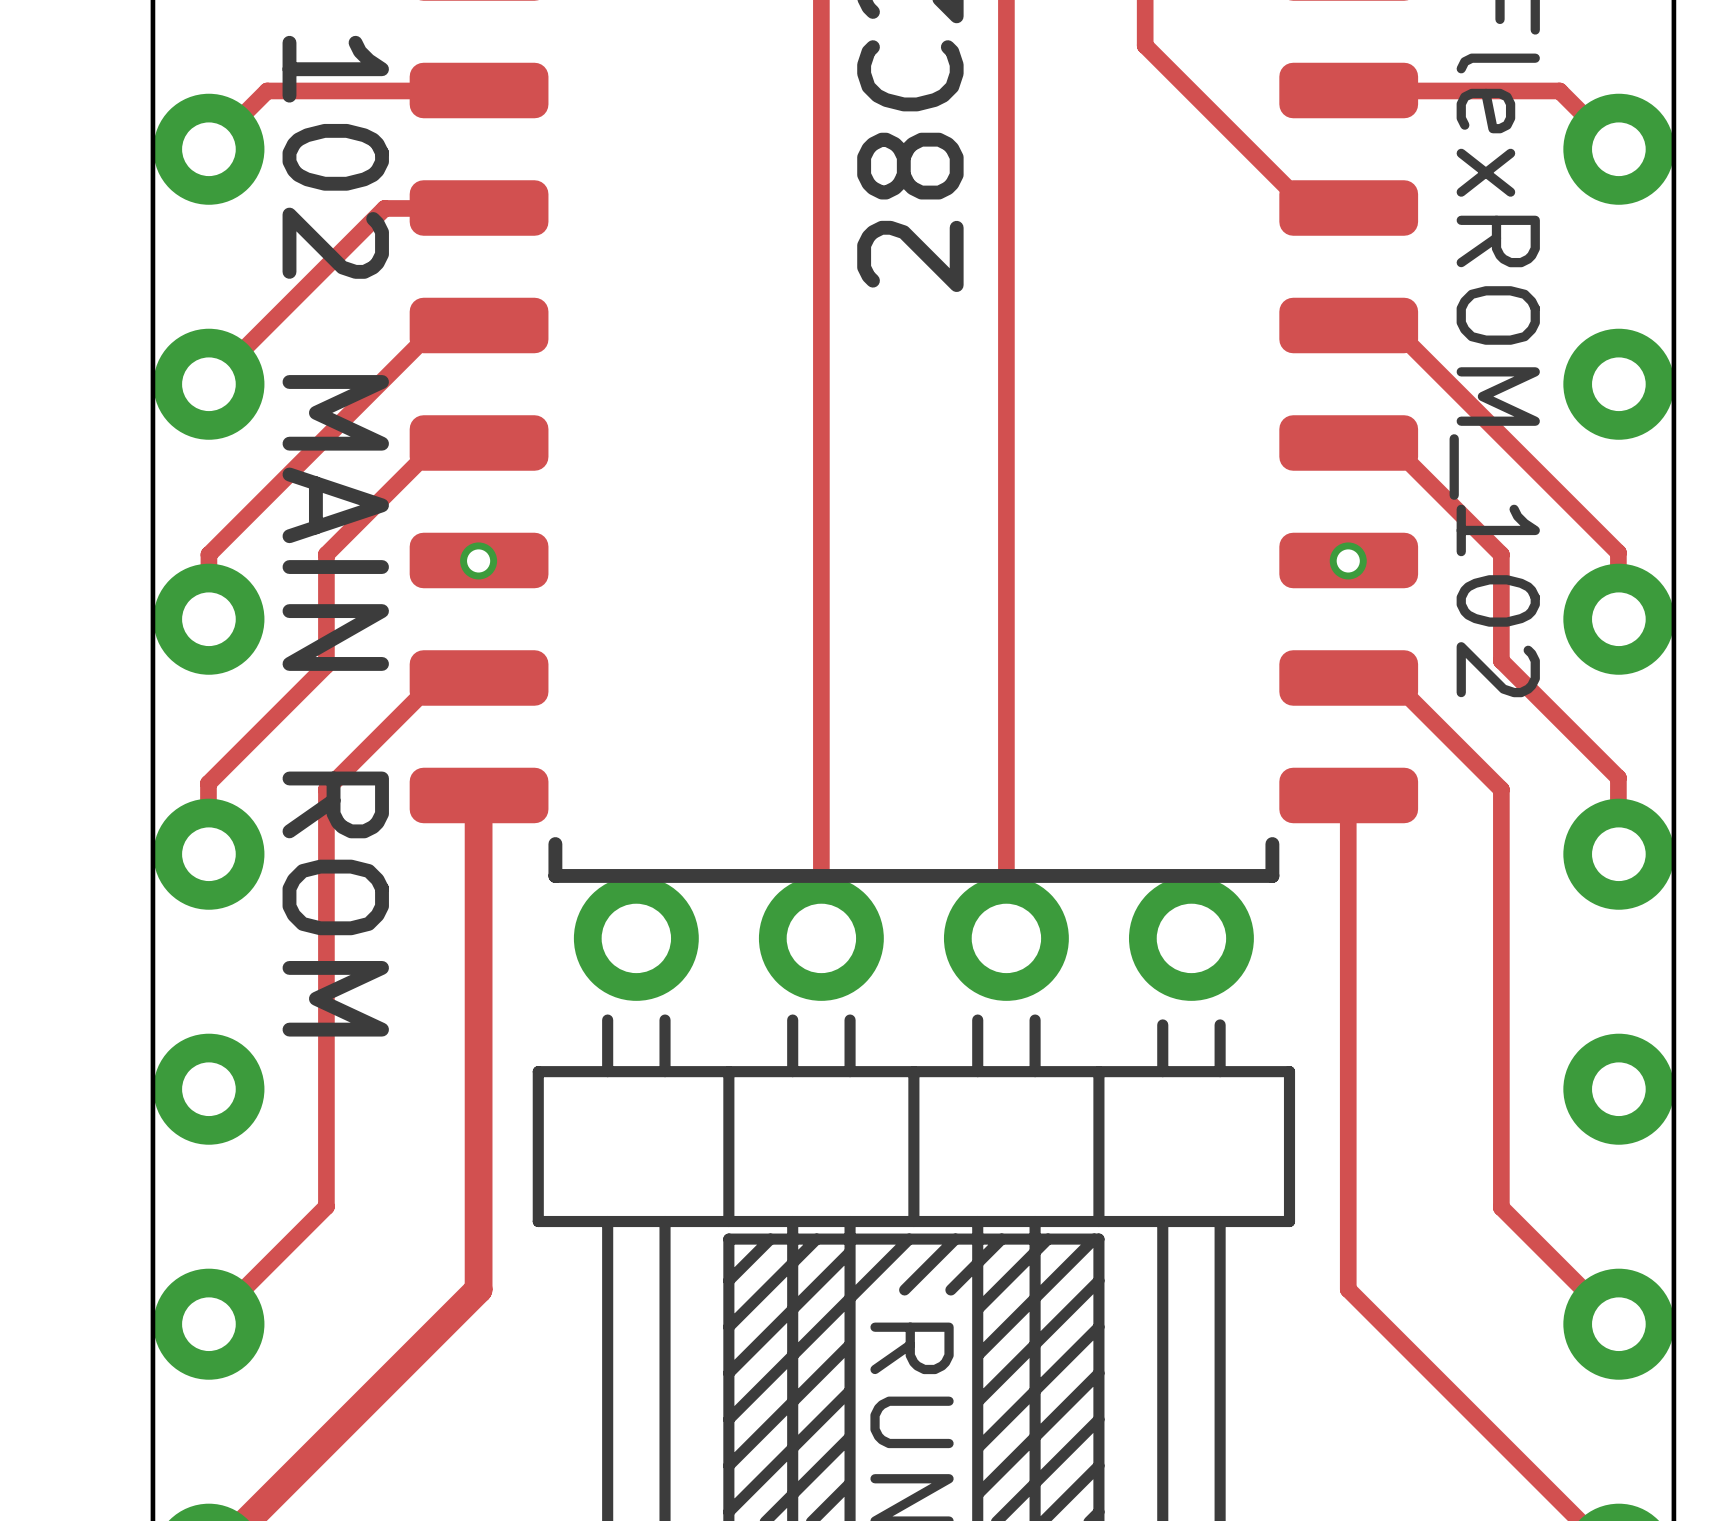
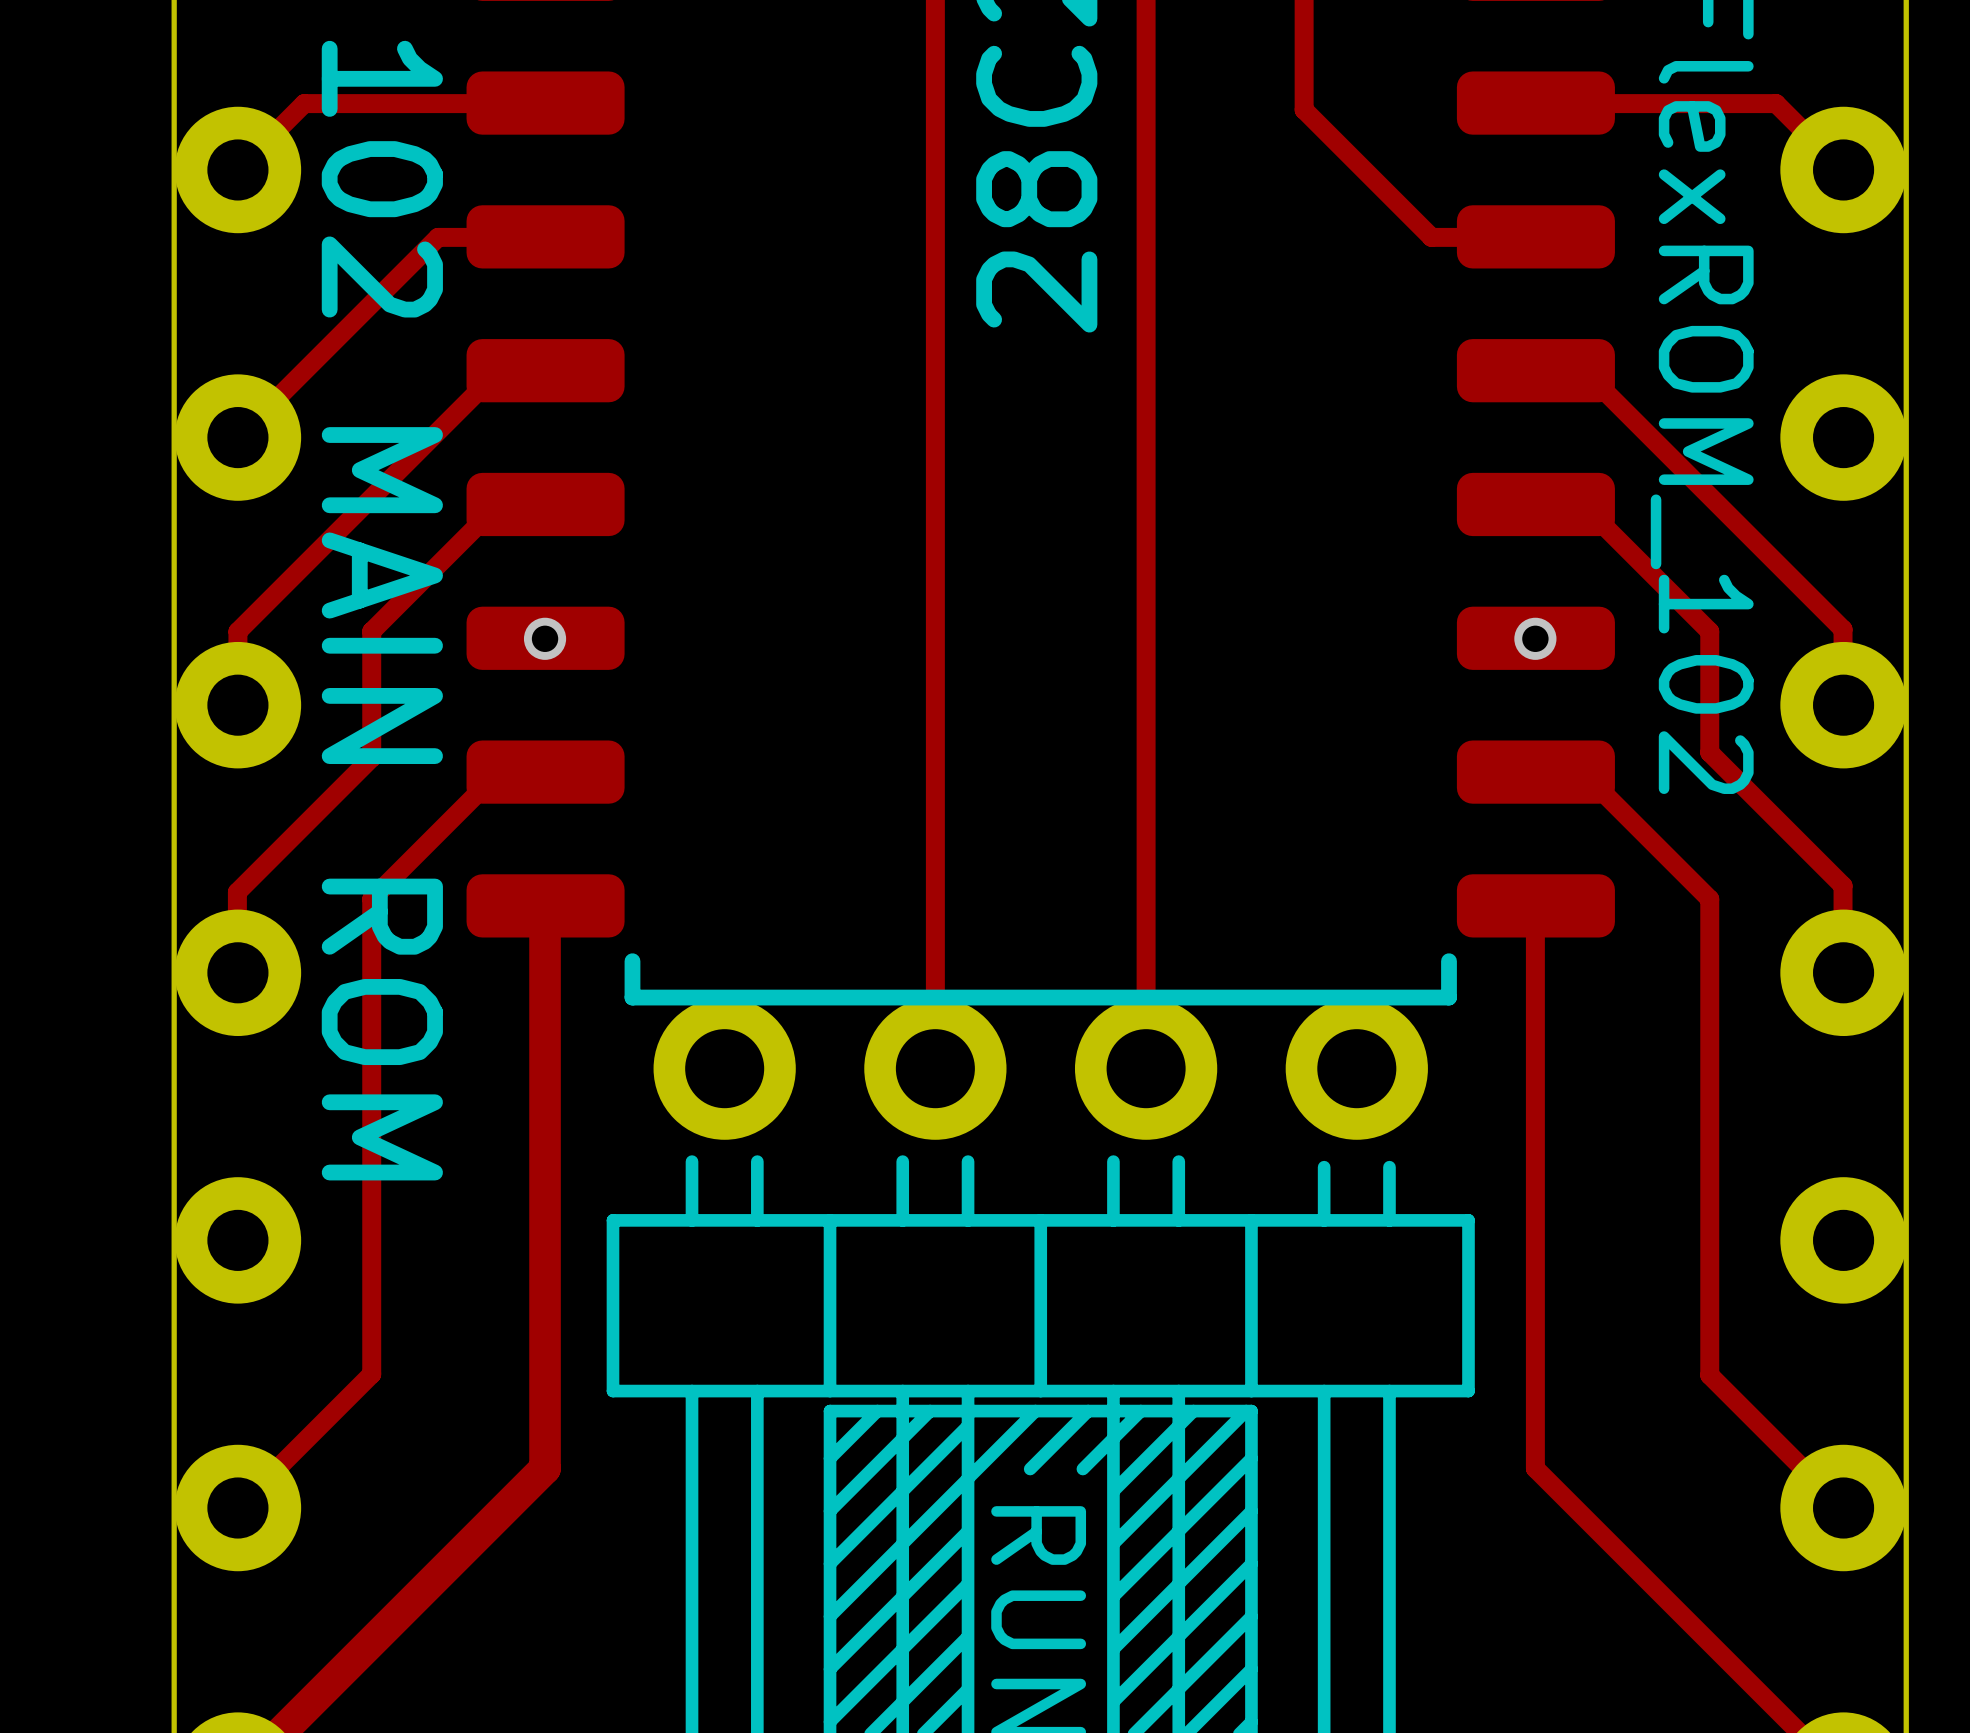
track: (1145, 45) (1308, 208) -> (1304, 51) (1304, 109) (1431, 237) (1489, 237)

